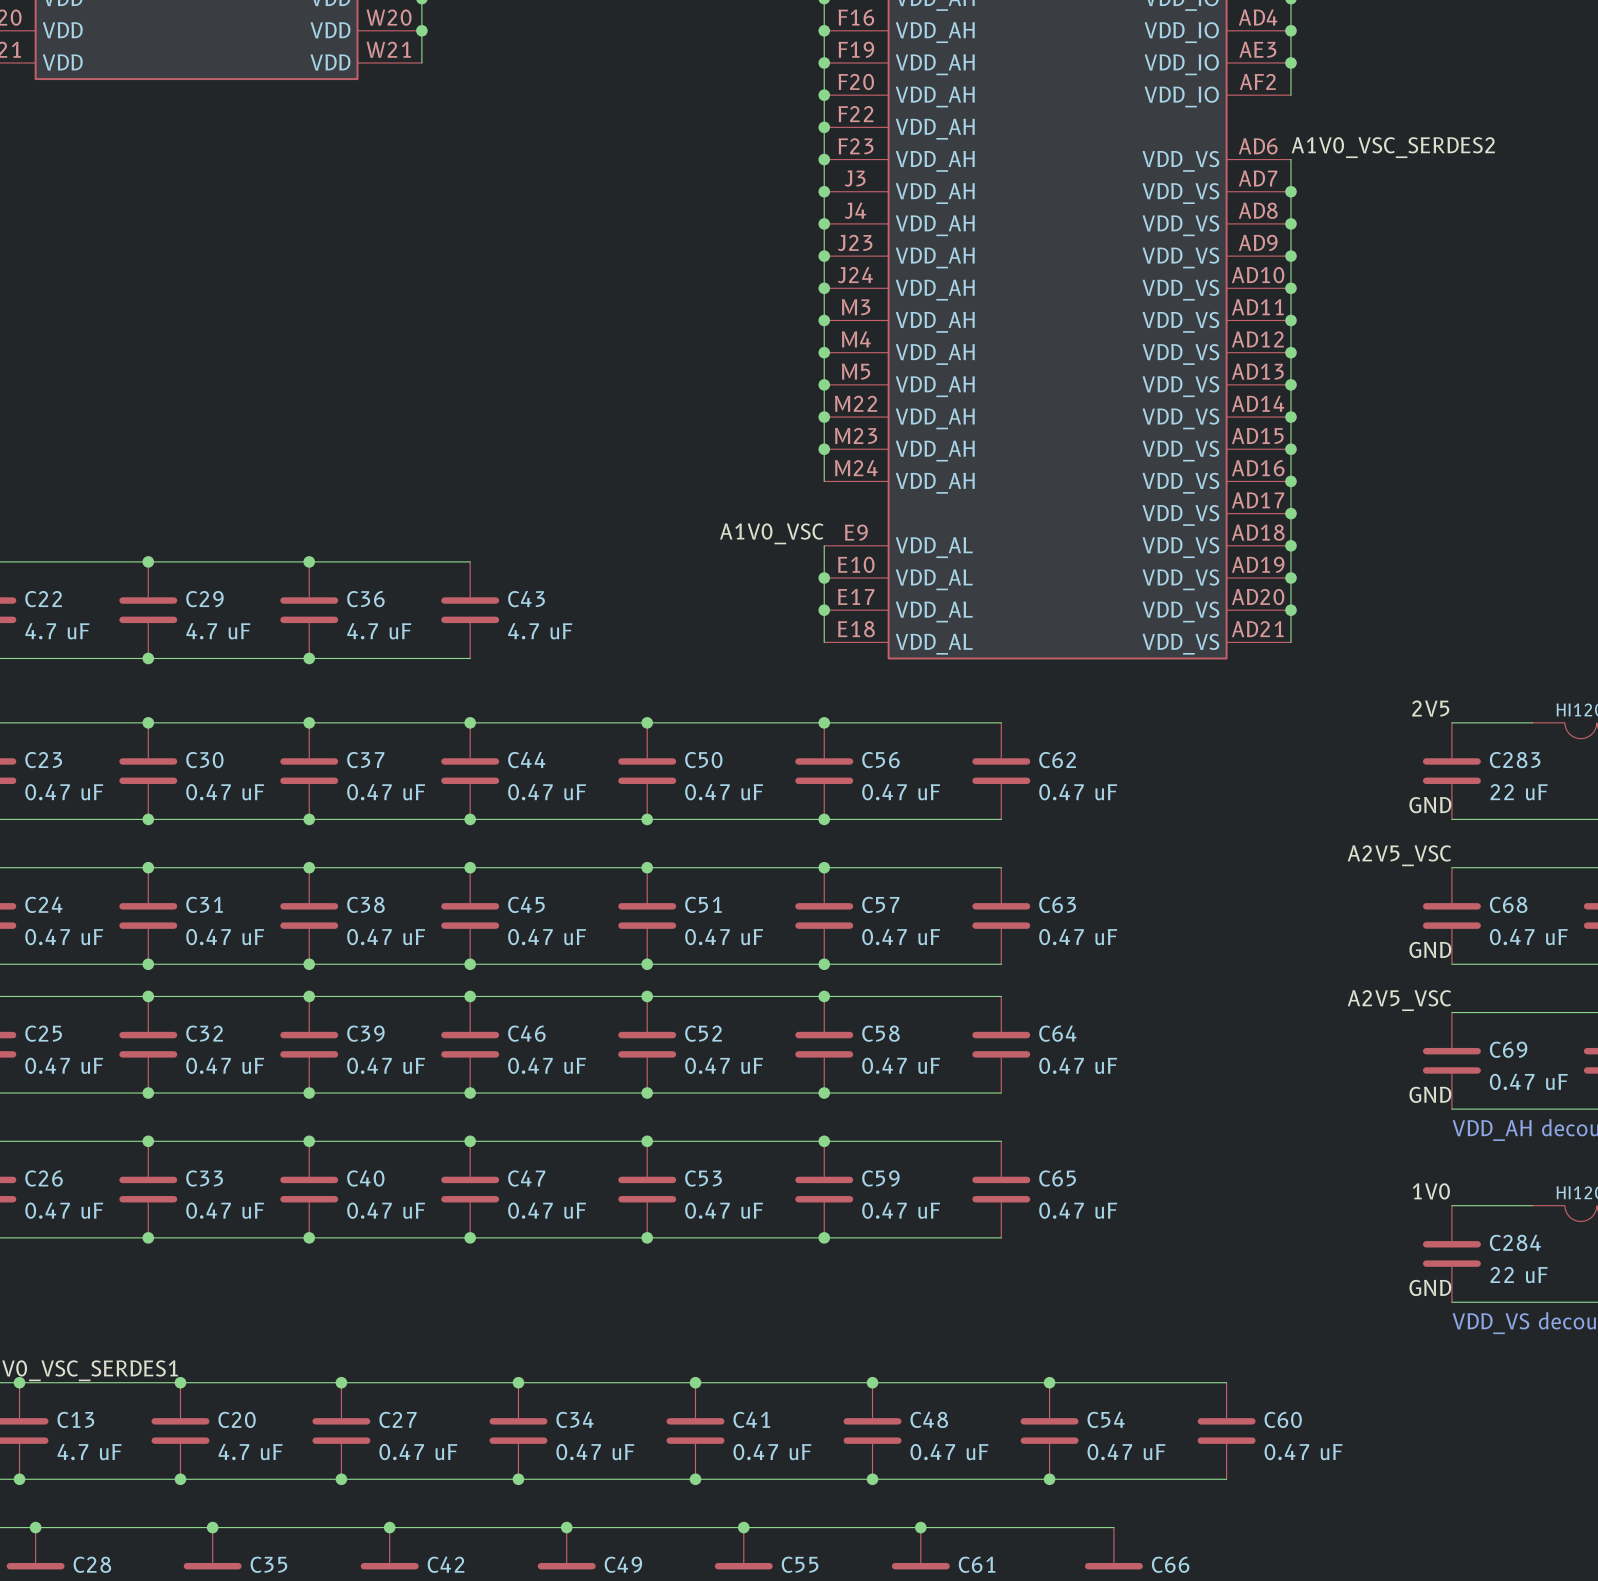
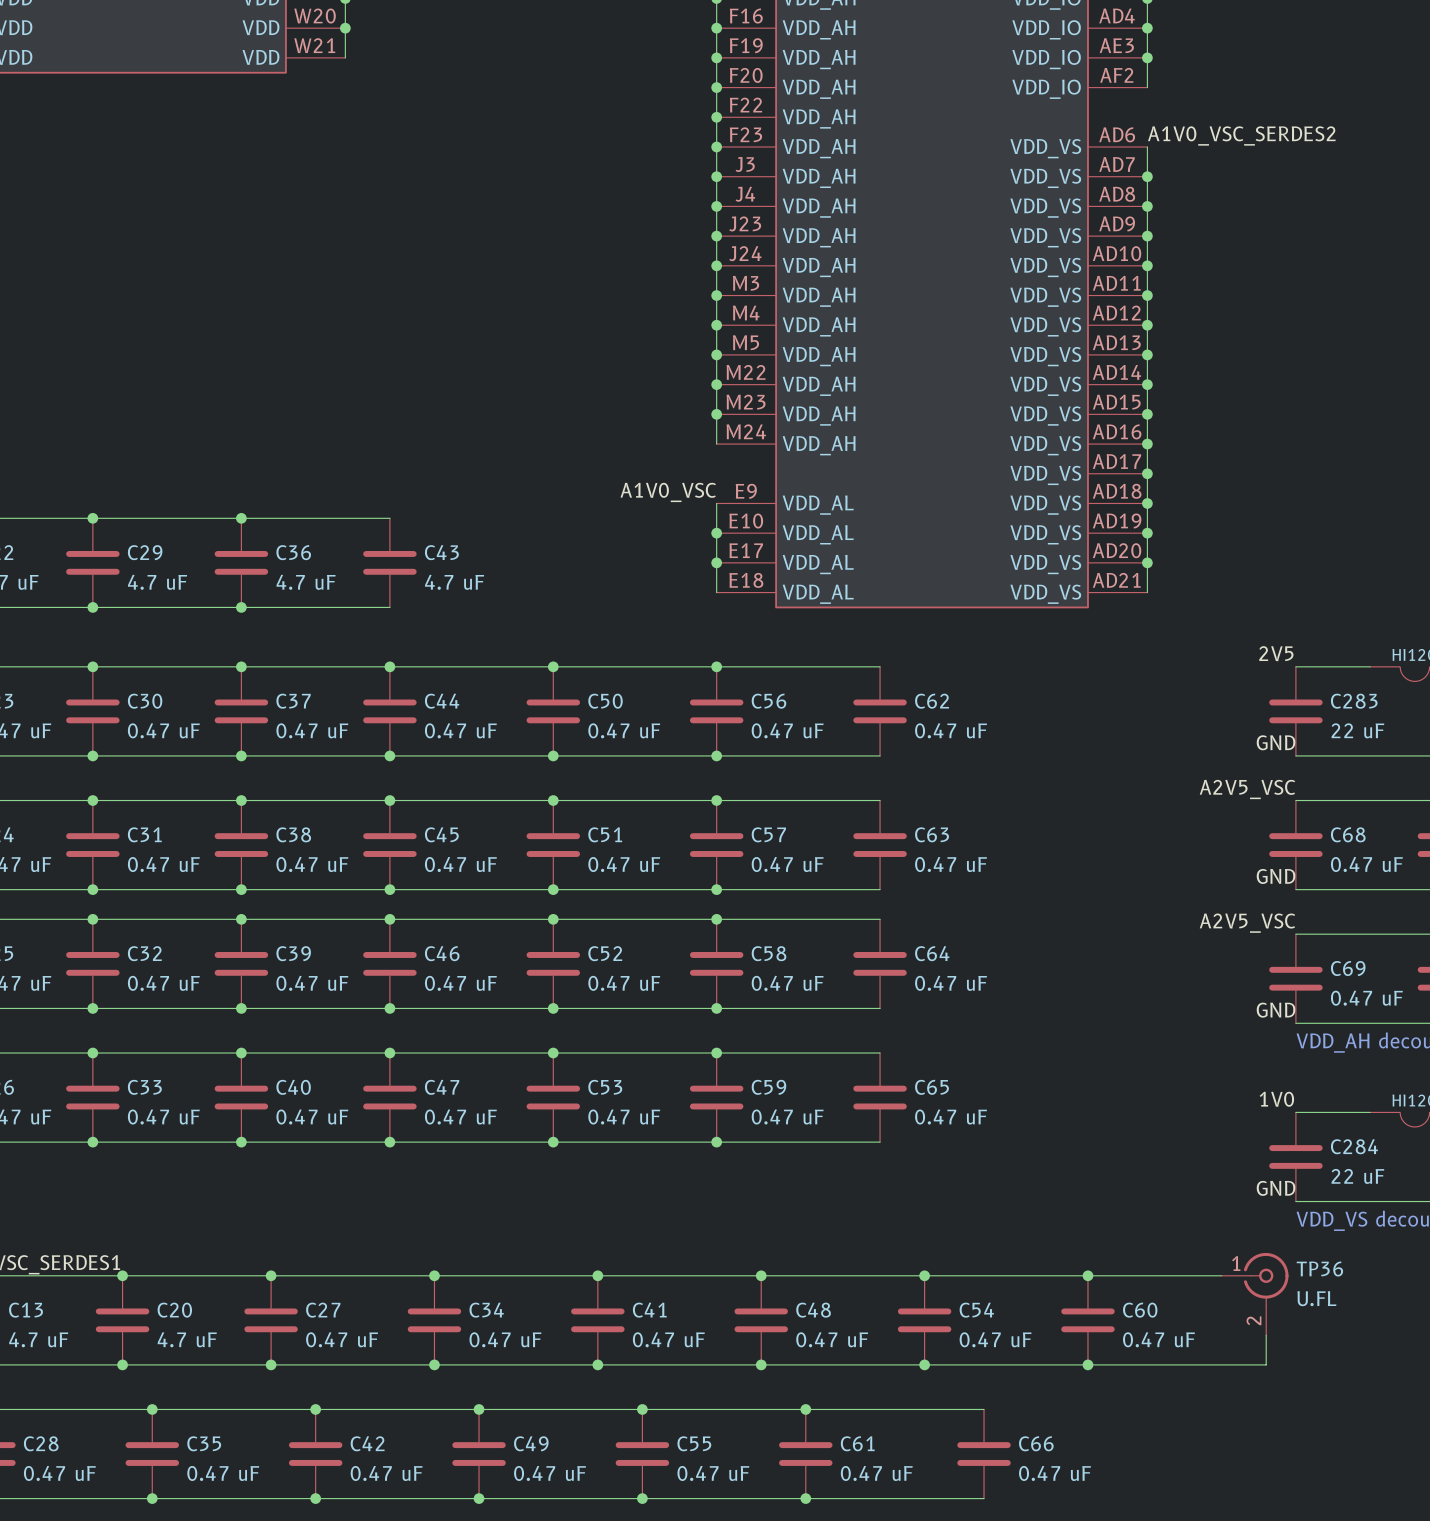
wire: none -> (1087, 1275) (1221, 1275)
junction: none -> (1087, 1275)
TP36: none -> U.FL (1255, 1294)
wire: none -> (1266, 1335) (1266, 1364) (1087, 1364)
junction: none -> (1087, 1364)

